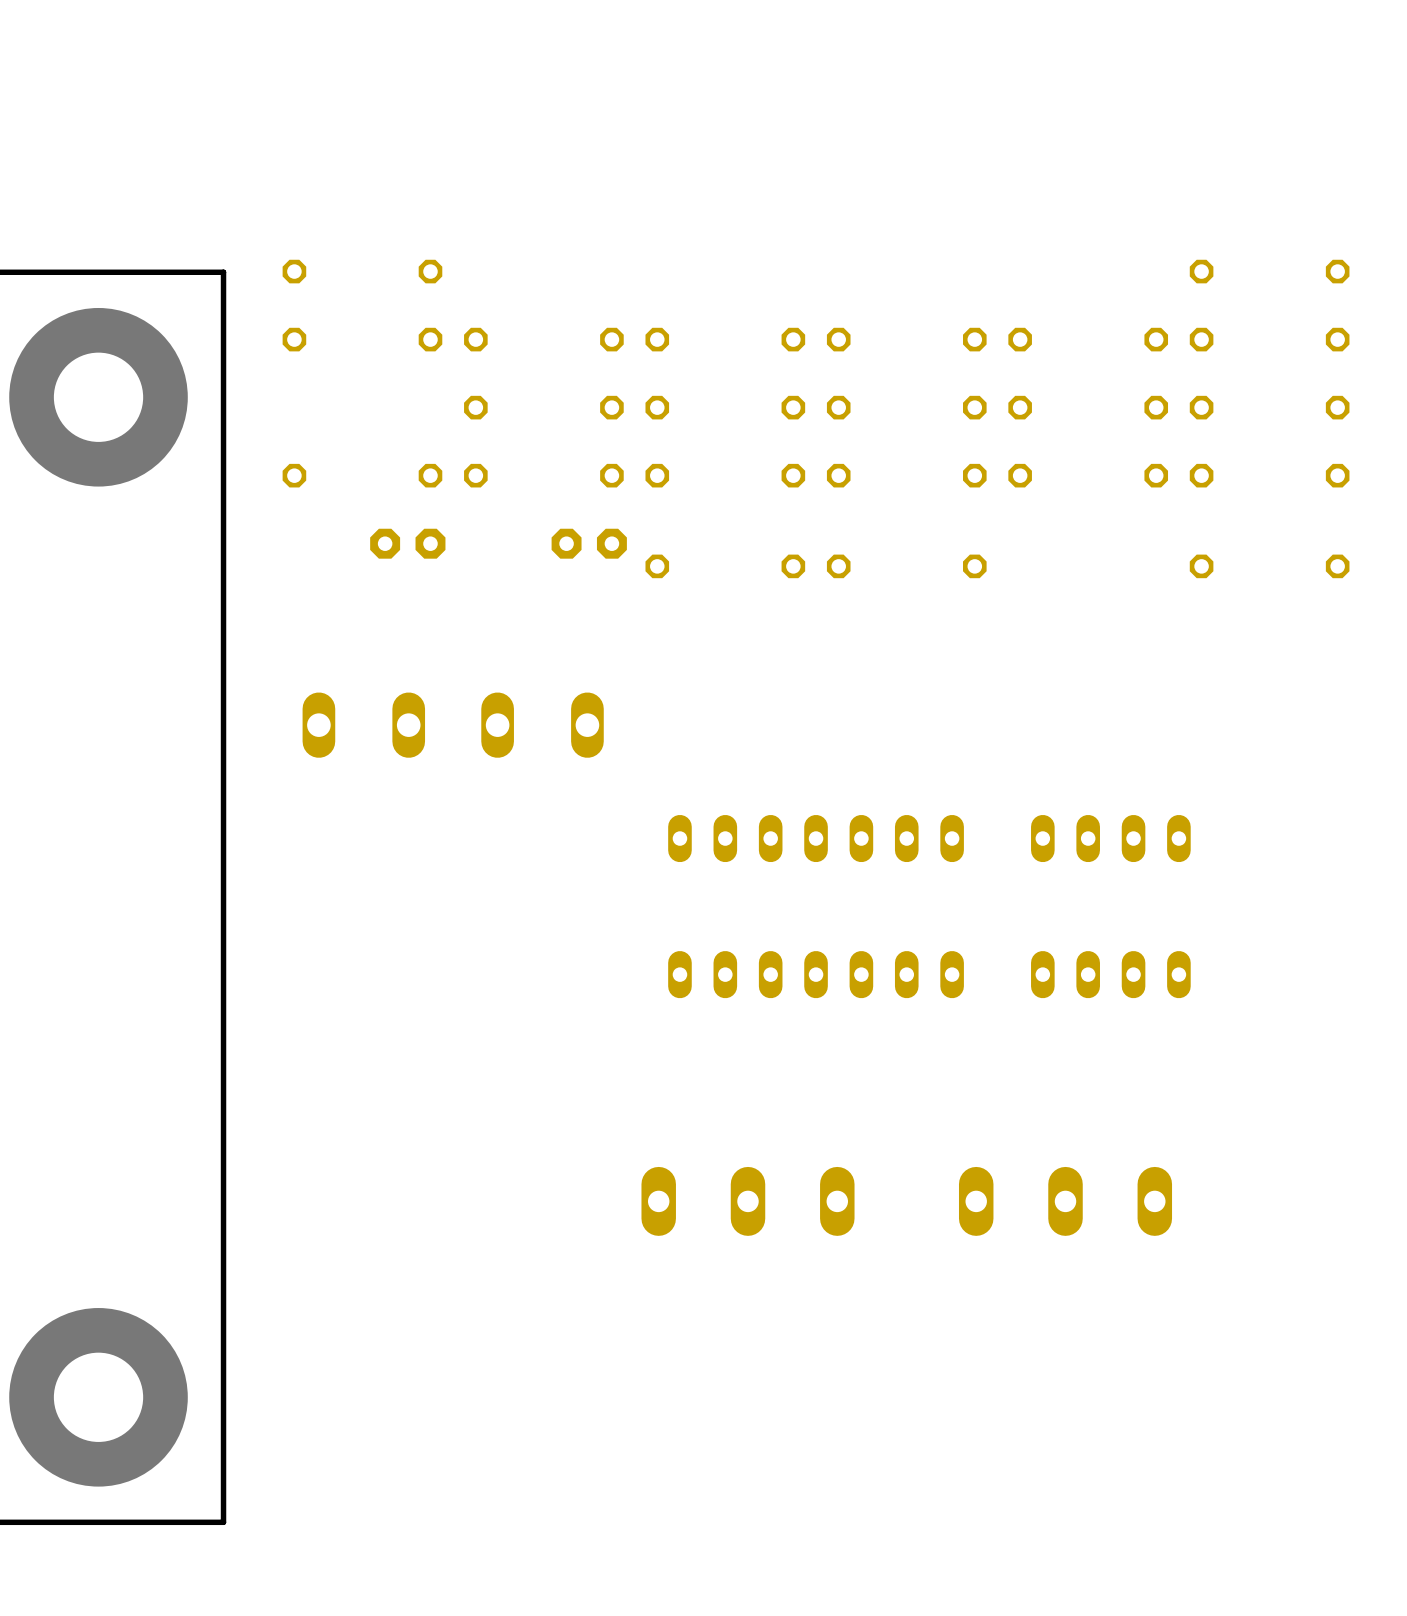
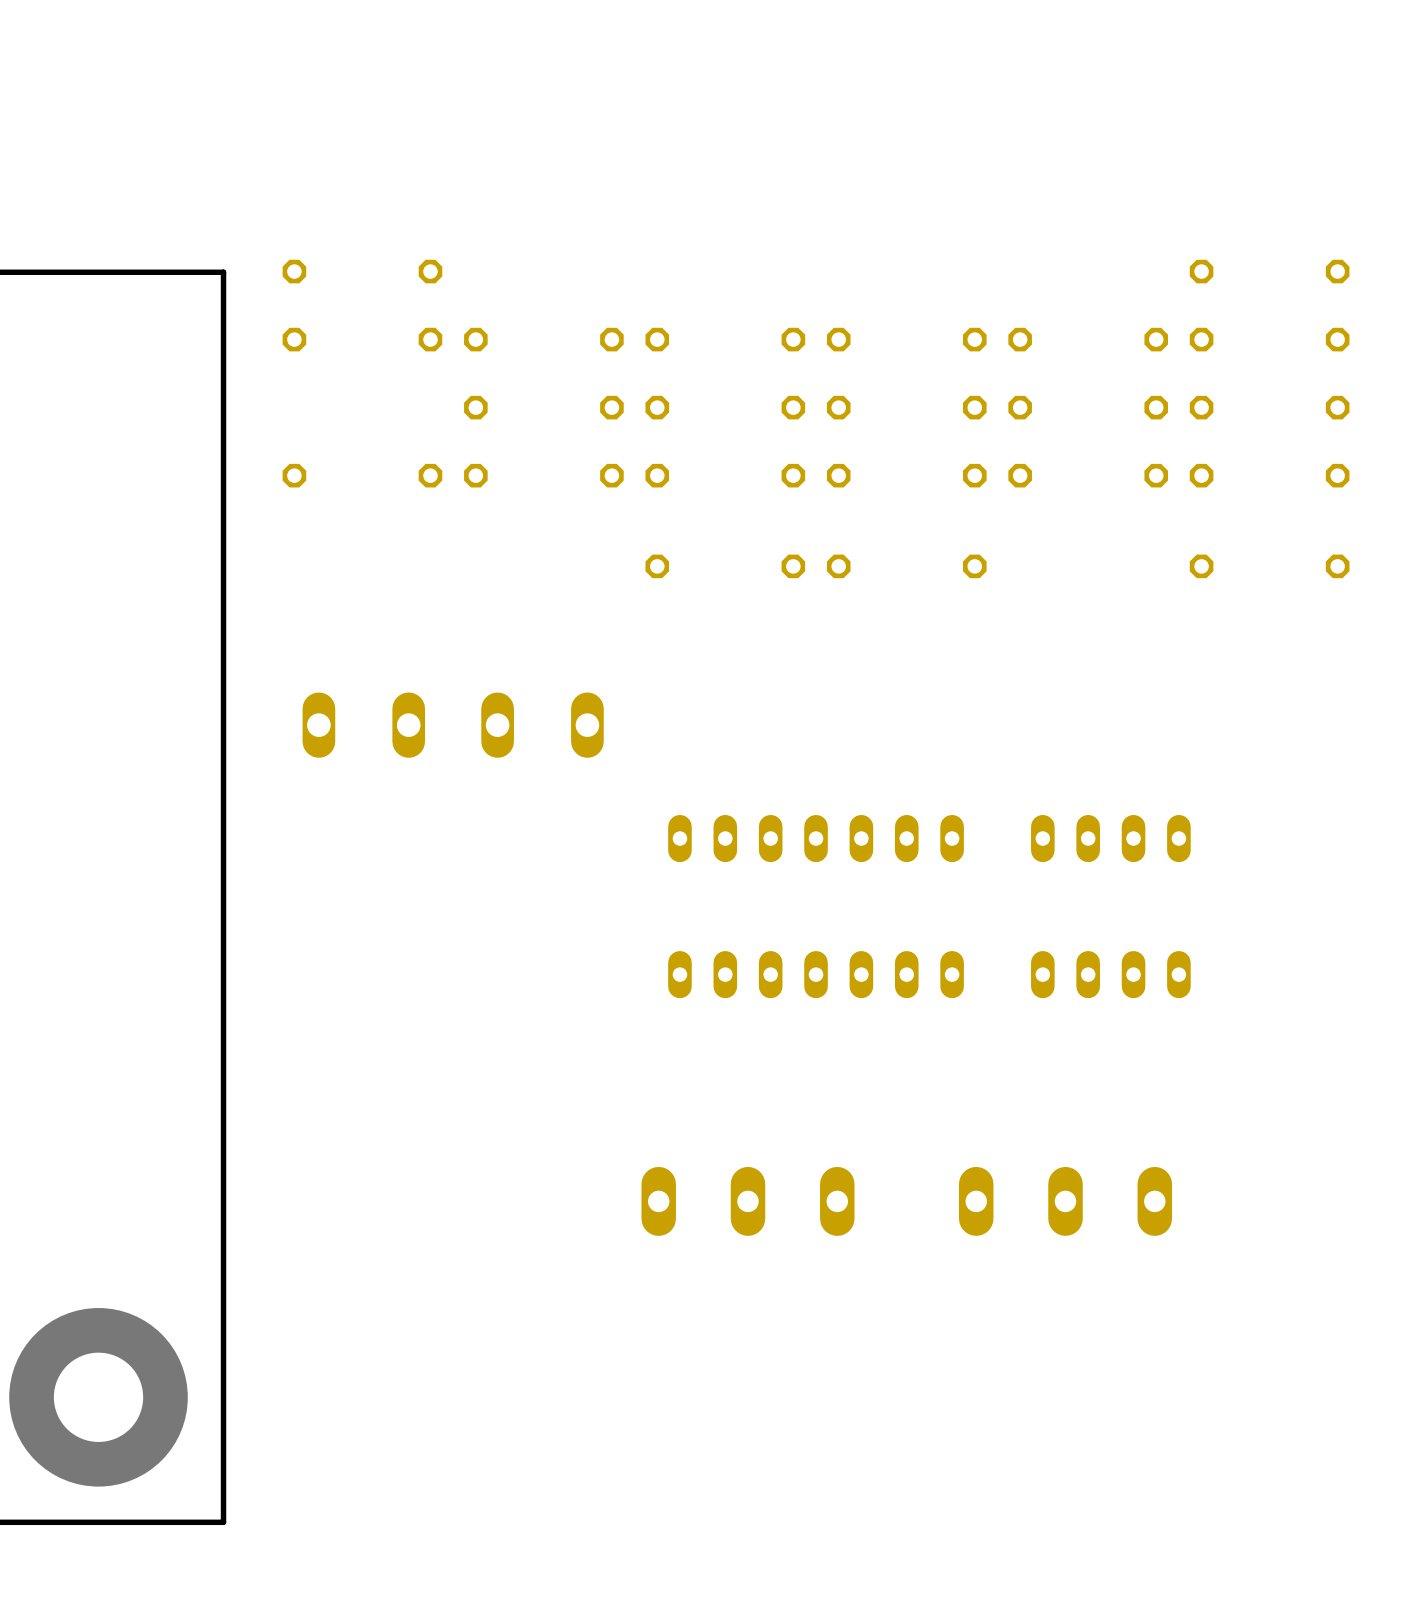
via: (98, 397) -> none
part: (407, 543) -> none
part: (589, 543) -> none

